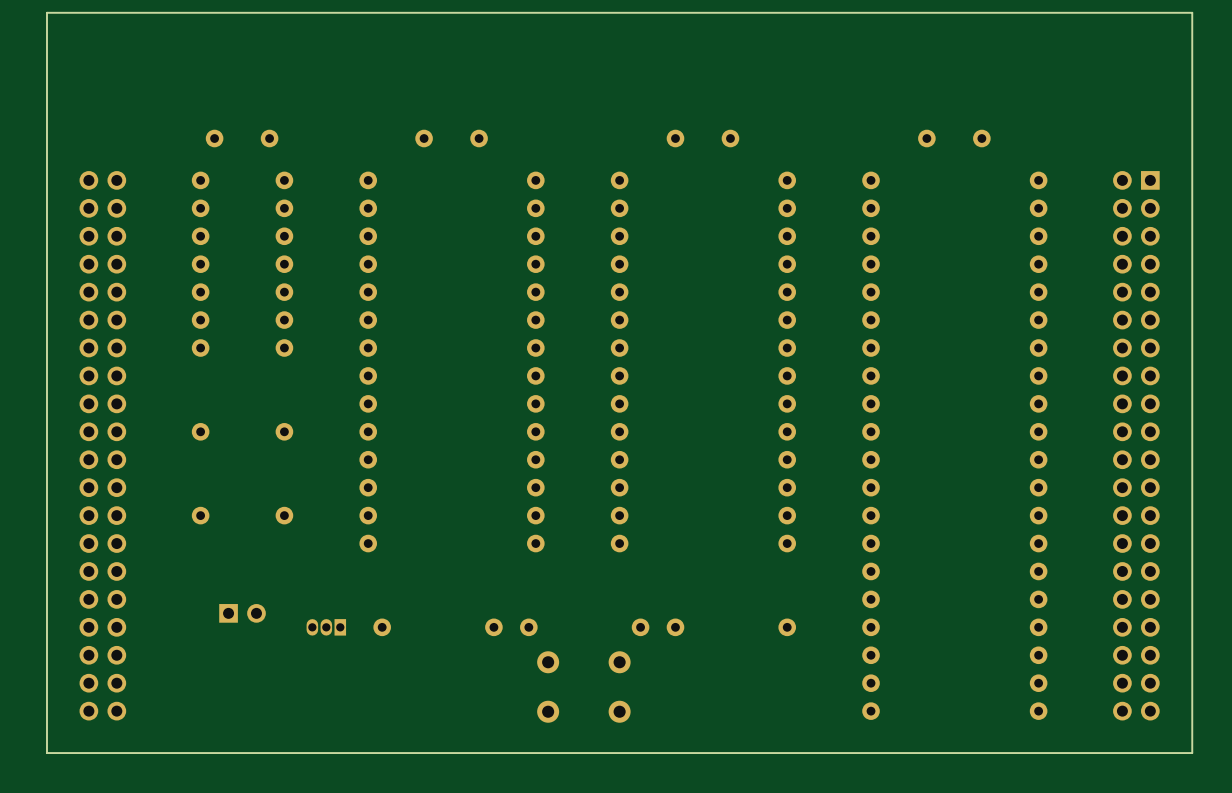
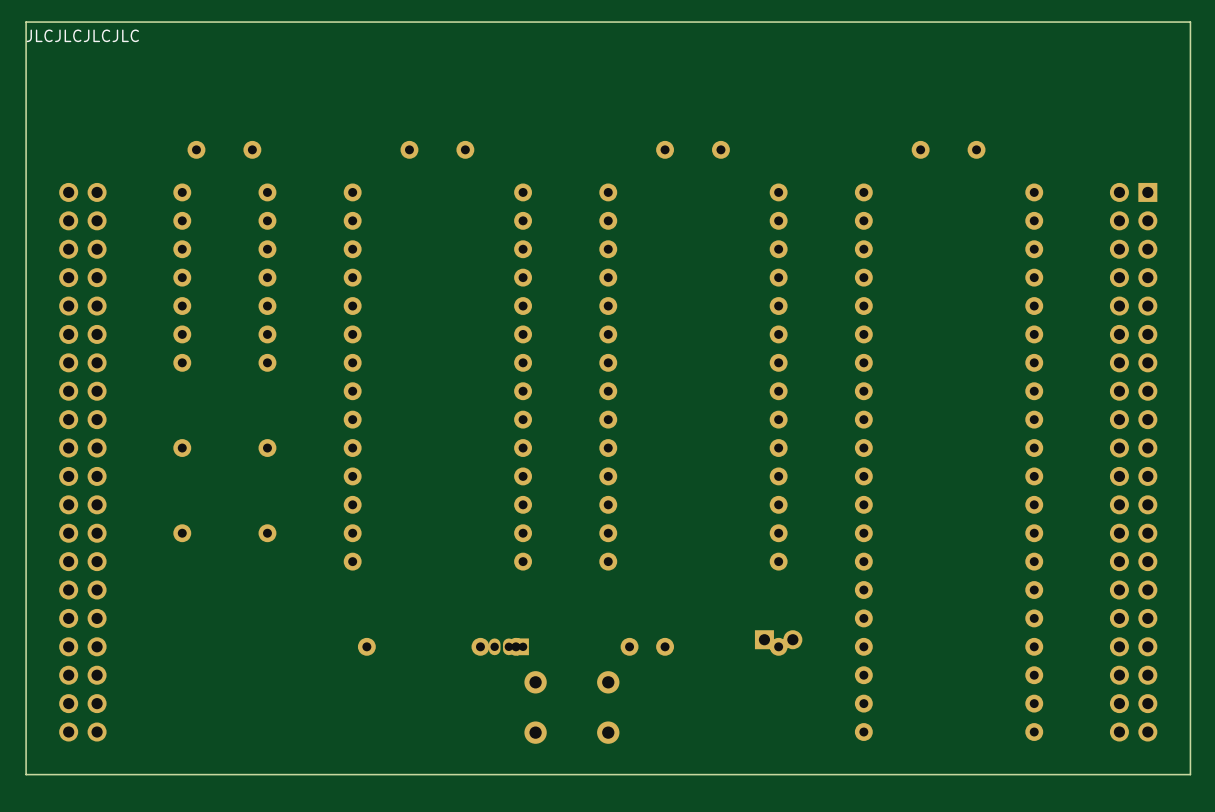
text: none -> JLCJLCJLCJLC (82, 35)
part: (242, 613) -> none
part: none -> (778, 639)
part position: (326, 627) -> (508, 646)

